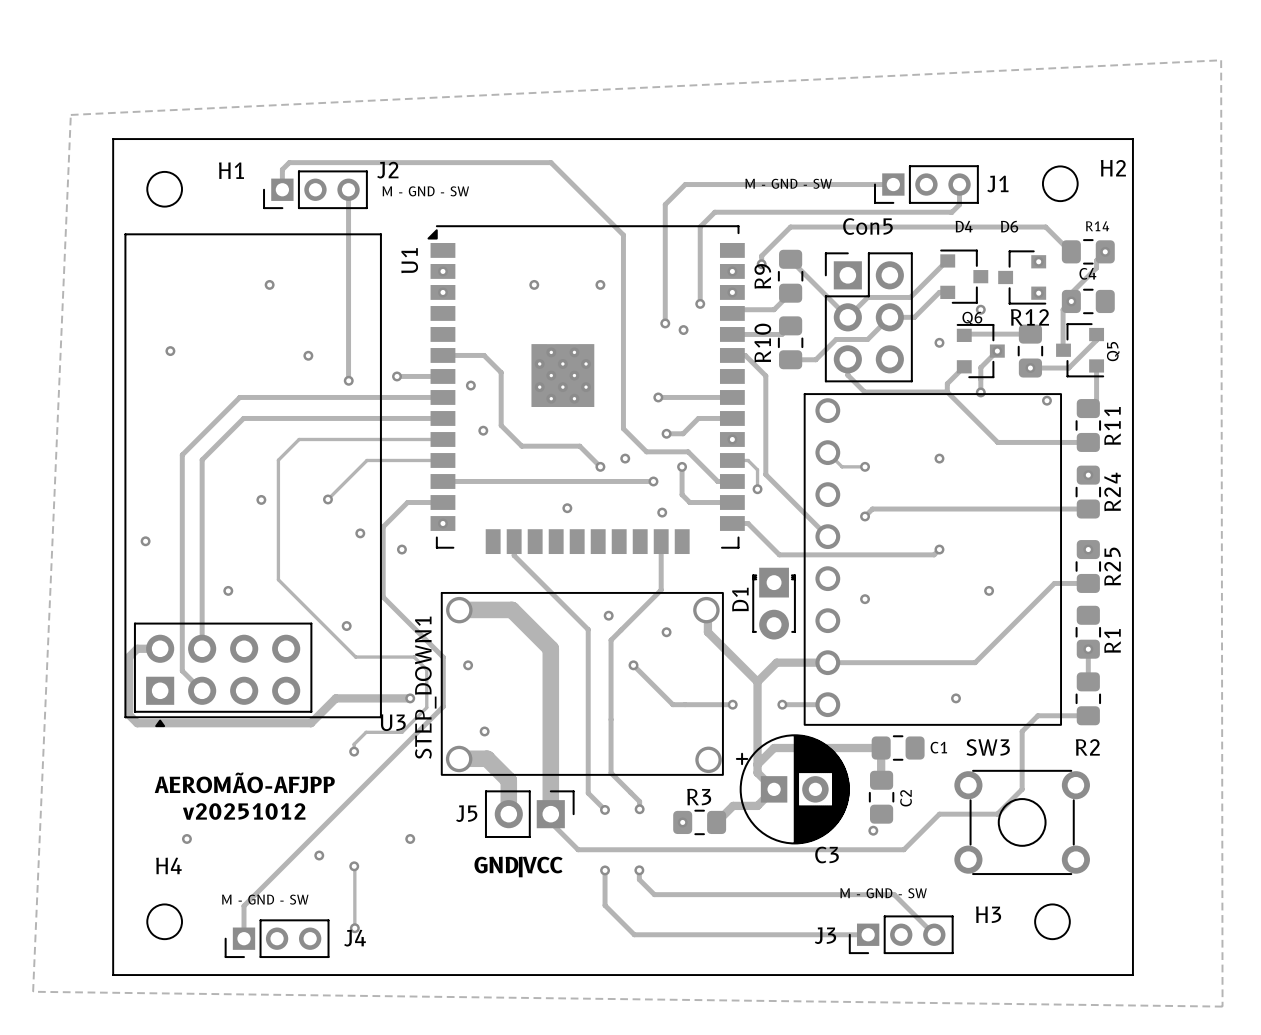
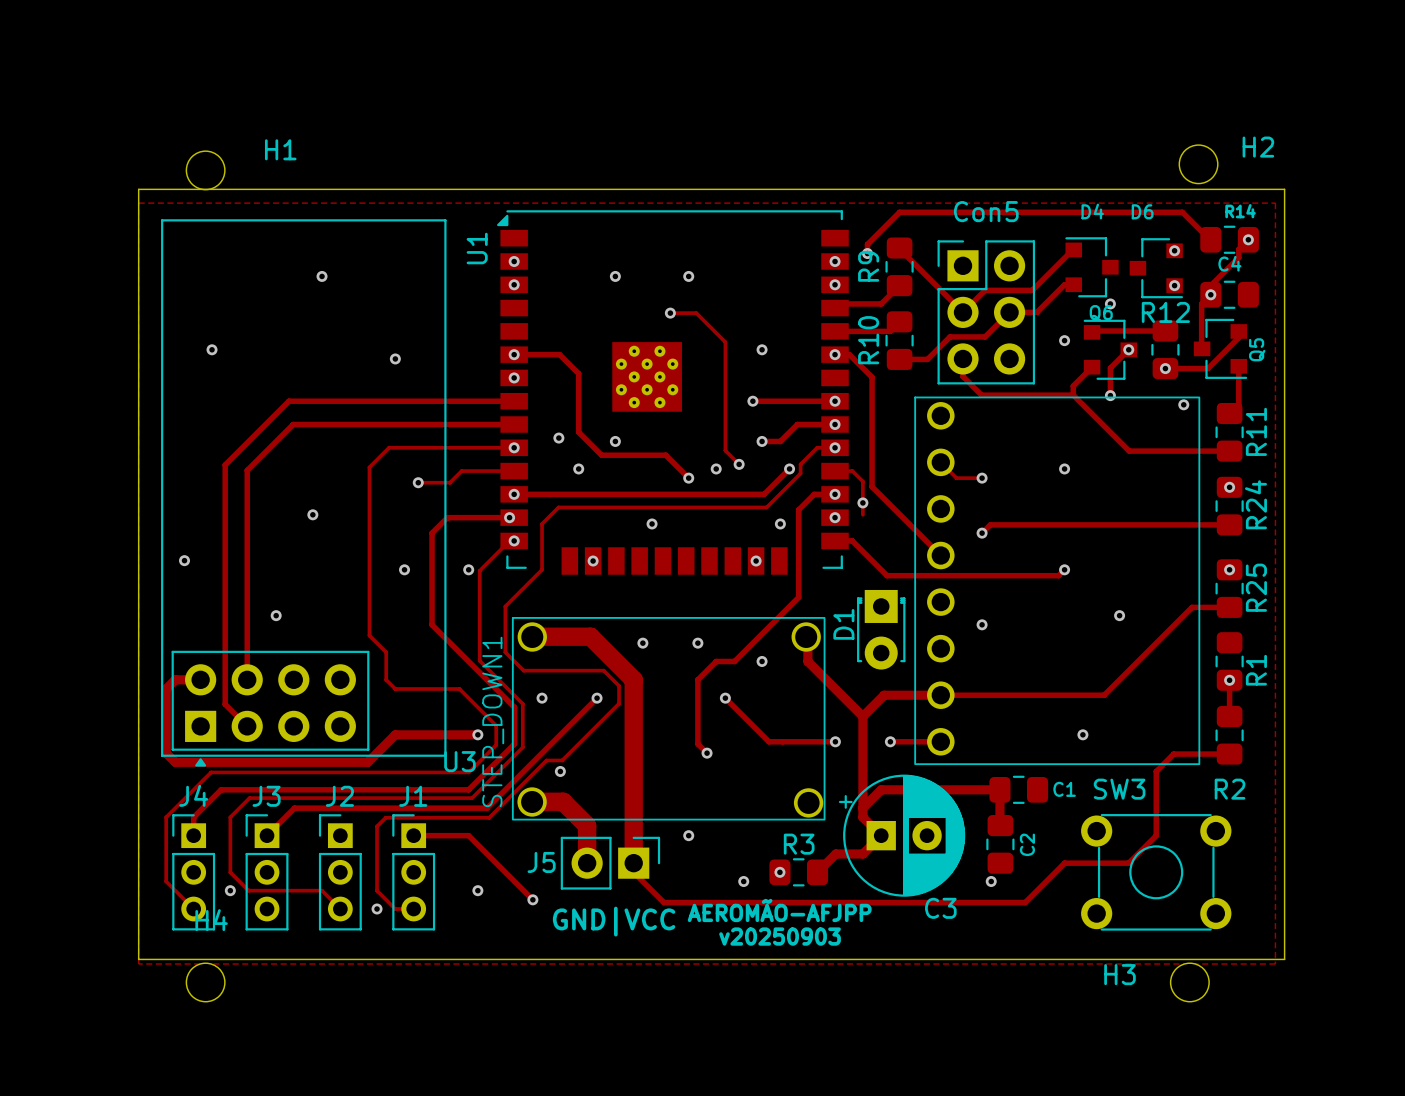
zone outline: (1221, 60) (70, 114) (33, 991) (1222, 1006) (1221, 60) -> (138, 203) (138, 964) (1275, 964) (1275, 203) (138, 203)
board edge: (113, 139) (1132, 139) (1132, 975) (113, 975) (113, 139) -> (138, 189) (138, 959) (1284, 959) (1284, 189) (138, 189)
J2 name position: J2 (387, 170) -> J2 (339, 796)
text: M - GND - SW (788, 183) -> none
track: (893, 184) (685, 184) (665, 204) (665, 323) -> none
J1 rotation: 0° (926, 184) -> 90° clockwise (413, 872)
J1 position: (926, 184) -> (413, 872)
track: (959, 184) (959, 204) (951, 212) (714, 212) (700, 226) (700, 303) -> none
J1 name position: J1 (997, 184) -> J1 (413, 796)
track: (282, 189) (282, 169) (289, 162) (551, 162) (623, 235) (623, 428) (646, 451) (688, 451) (717, 481) -> (707, 753) (697, 743) (697, 679) (716, 661) (734, 661) (798, 597) (798, 509) (814, 494) (818, 494)
J2 rotation: 0° (315, 189) -> 90° clockwise (340, 872)
J2 position: (315, 189) -> (340, 872)
track: (348, 189) (348, 380) -> none
text: M - GND - SW (425, 191) -> none
via: (700, 303) -> none
track: none -> (670, 313) (696, 313) (725, 342) (725, 450) (739, 464)
via: none -> (670, 313)
via: (665, 323) -> none
via: (683, 330) -> none
via: none -> (762, 349)
via: (308, 355) -> none
via: none -> (514, 354)
via: none -> (835, 354)
via: none -> (395, 358)
track: (397, 376) (442, 376) -> none
via: (397, 376) -> none
via: none -> (514, 377)
via: (348, 380) -> none
via: (470, 385) -> none
via: none -> (835, 401)
via: none -> (835, 424)
via: none -> (615, 441)
track: (330, 439) (299, 439) (278, 460) (278, 579) (355, 657) -> (389, 447) (369, 467) (369, 635) (386, 652) (386, 679) (395, 688) (417, 688)
via: none -> (514, 447)
track: none -> (835, 447) (817, 447) (800, 464) (800, 473) (766, 507) (558, 507) (542, 523) (542, 569) (505, 606) (505, 652) (523, 670) (603, 670) (619, 685) (619, 703) (562, 760) (546, 760) (489, 817) (385, 817) (377, 826) (377, 890) (395, 909) (413, 909)
via: none -> (739, 464)
via: none -> (578, 468)
track: none -> (789, 468) (764, 494) (747, 494)
track: (395, 460) (366, 460) (327, 499) -> (461, 471) (450, 482) (418, 482)
track: (682, 466) (682, 494) (689, 502) (732, 502) -> none
via position: (682, 466) -> (789, 468)
via: none -> (418, 482)
via: none -> (514, 494)
via: (653, 481) -> none
via: none -> (835, 494)
track: none -> (862, 502) (862, 514)
via: (327, 499) -> none
track: (407, 502) (383, 526) (383, 597) (443, 657) (443, 673) -> (474, 517) (447, 517) (432, 533) (432, 624) (514, 707)
via: none -> (509, 517)
via: none -> (835, 517)
via: none -> (780, 523)
via: (662, 512) -> none
track: none -> (509, 540) (479, 570) (479, 660) (522, 703) (522, 747) (472, 798) (249, 798) (230, 817) (230, 872) (248, 890) (322, 890) (340, 909)
via position: (360, 533) -> (404, 569)
track: (514, 541) (514, 555) (588, 629) (588, 793) (605, 809) -> none
via: none -> (593, 561)
track: (661, 541) (661, 590) (611, 640) (611, 772) (639, 801) (639, 809) -> none
via: none -> (756, 561)
via: none -> (642, 643)
via: (346, 626) -> none
track: (393, 657) (414, 657) (426, 669) (426, 690) -> (459, 688) (496, 725)
track: none -> (597, 698) (487, 808) (294, 808) (267, 835)
via: none -> (597, 698)
via: none -> (707, 753)
track: (366, 732) (354, 744) (354, 751) -> (428, 772) (211, 772) (166, 817) (166, 881) (193, 909)
track: (401, 748) (244, 905) (244, 938) -> (468, 789) (221, 789) (193, 817) (193, 835)
via: (354, 751) -> none
text: AEROMÃO-AFJPP (244, 782) -> none
track: none -> (413, 835) (468, 835) (532, 899)
via position: (605, 809) -> (688, 835)
via: (639, 809) -> none
text: v20251012 (244, 811) -> none
via: none -> (743, 881)
via: none -> (532, 899)
text: none -> AEROMÃO-AFJPP (779, 910)
track: (354, 866) (354, 928) -> none
via: (354, 866) -> none
track: (605, 870) (605, 905) (634, 934) (868, 934) -> none
via: (605, 870) -> none
track: (639, 870) (639, 879) (654, 894) (894, 894) (934, 934) -> none
via: (639, 870) -> none
text: none -> v20250903 (780, 936)
text: M - GND - SW (883, 893) -> none
text: M - GND - SW (265, 899) -> none
via: (354, 928) -> none
J3 rotation: 0° (901, 934) -> 90° clockwise (267, 872)
J3 position: (901, 934) -> (267, 872)
J4 rotation: 0° (277, 938) -> 90° clockwise (193, 872)
J4 position: (277, 938) -> (193, 872)
J4 name position: J4 (355, 938) -> J4 (193, 795)

